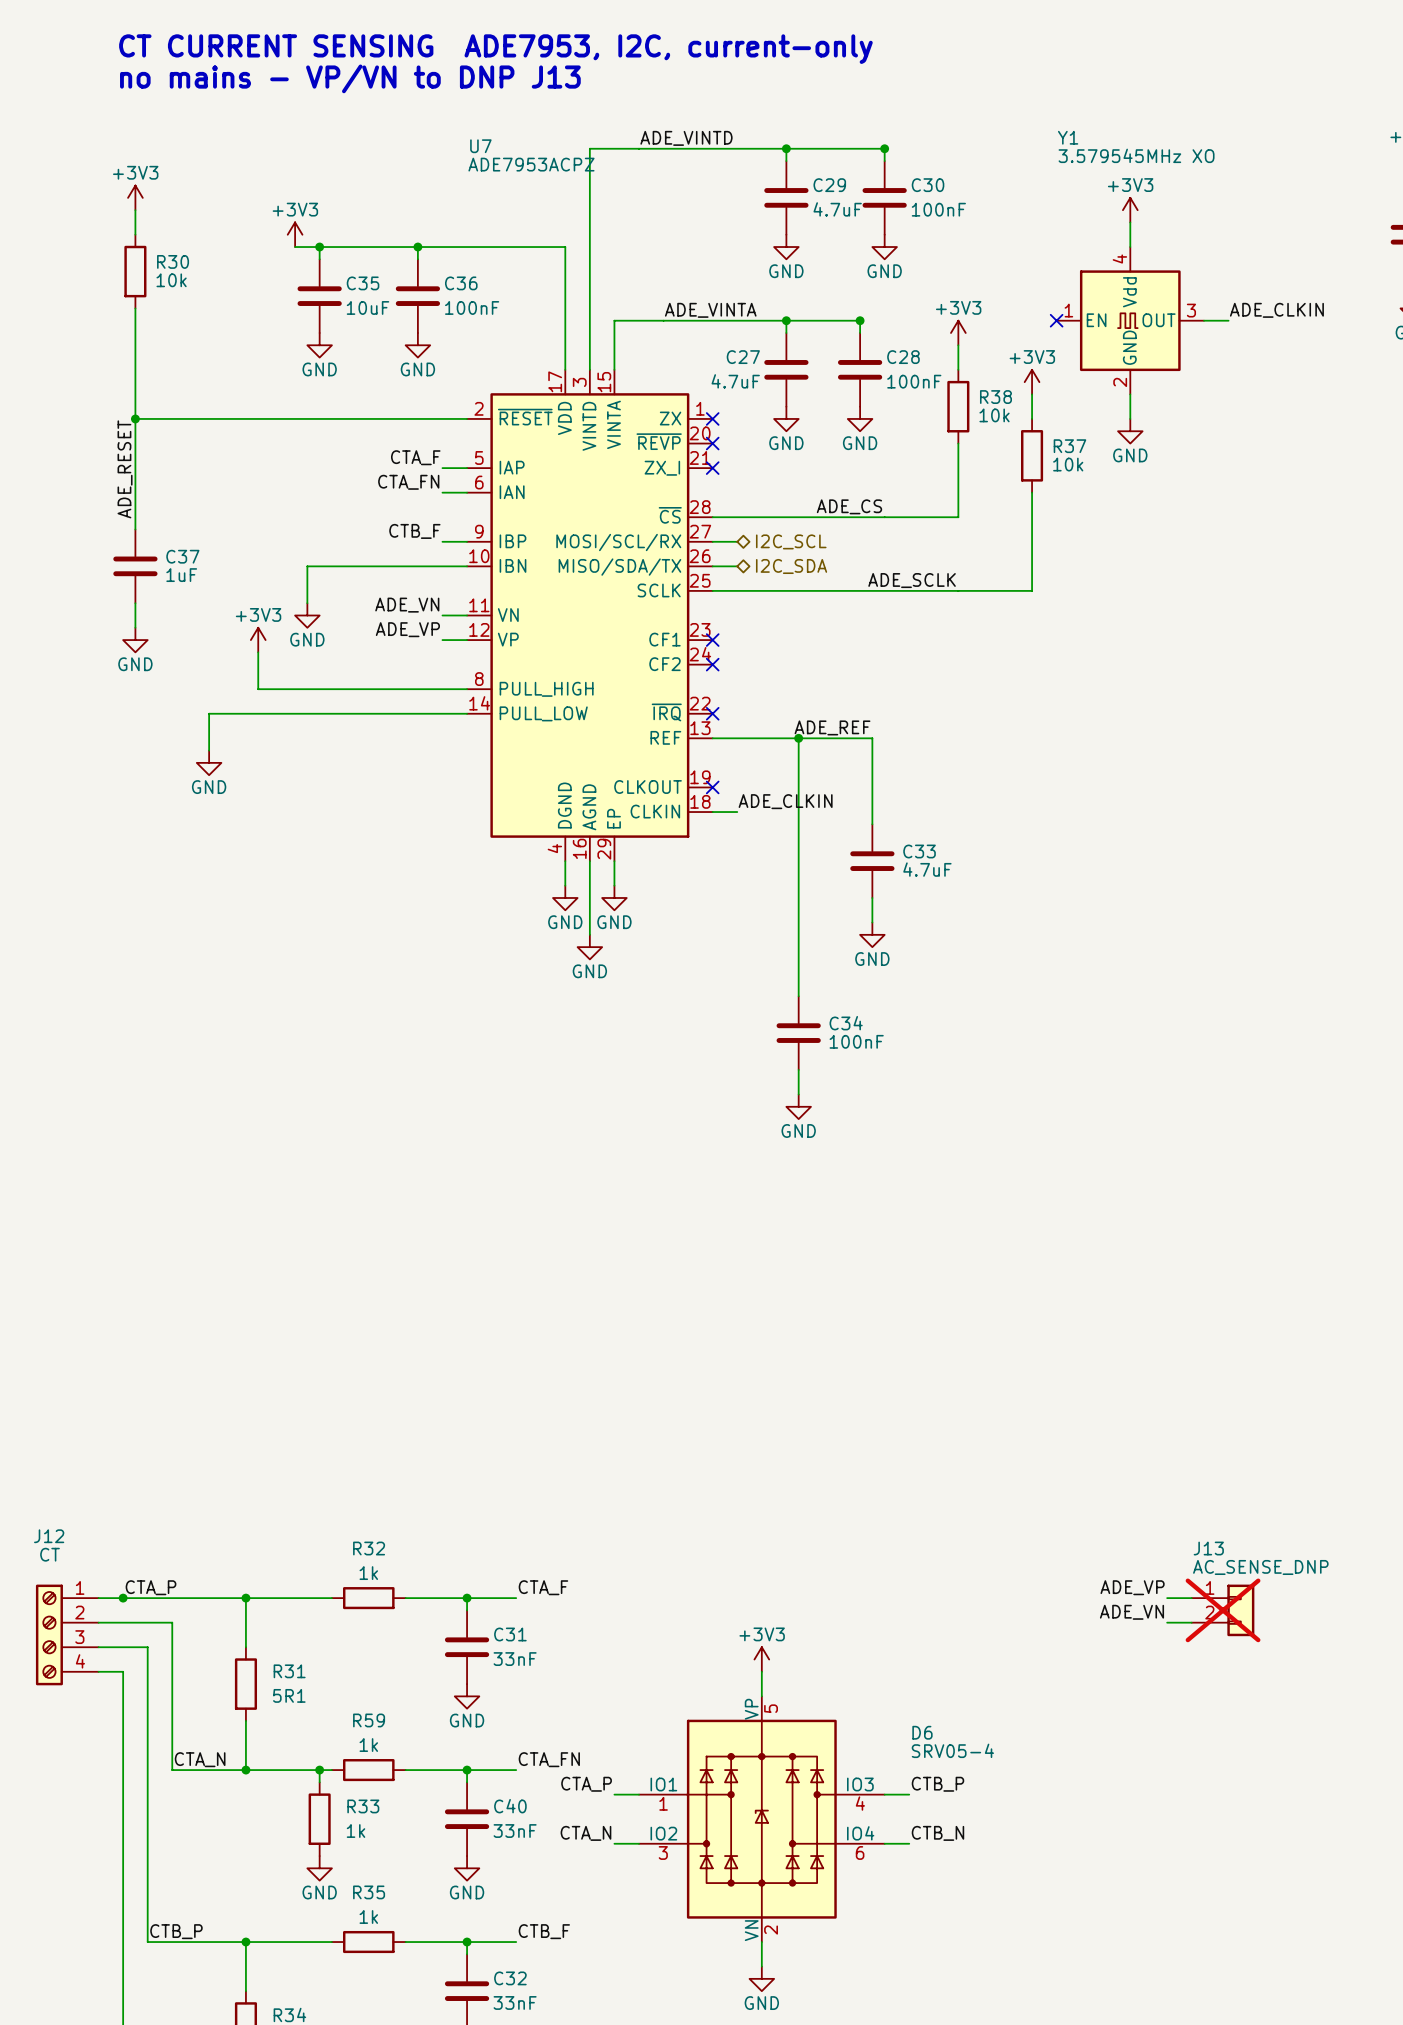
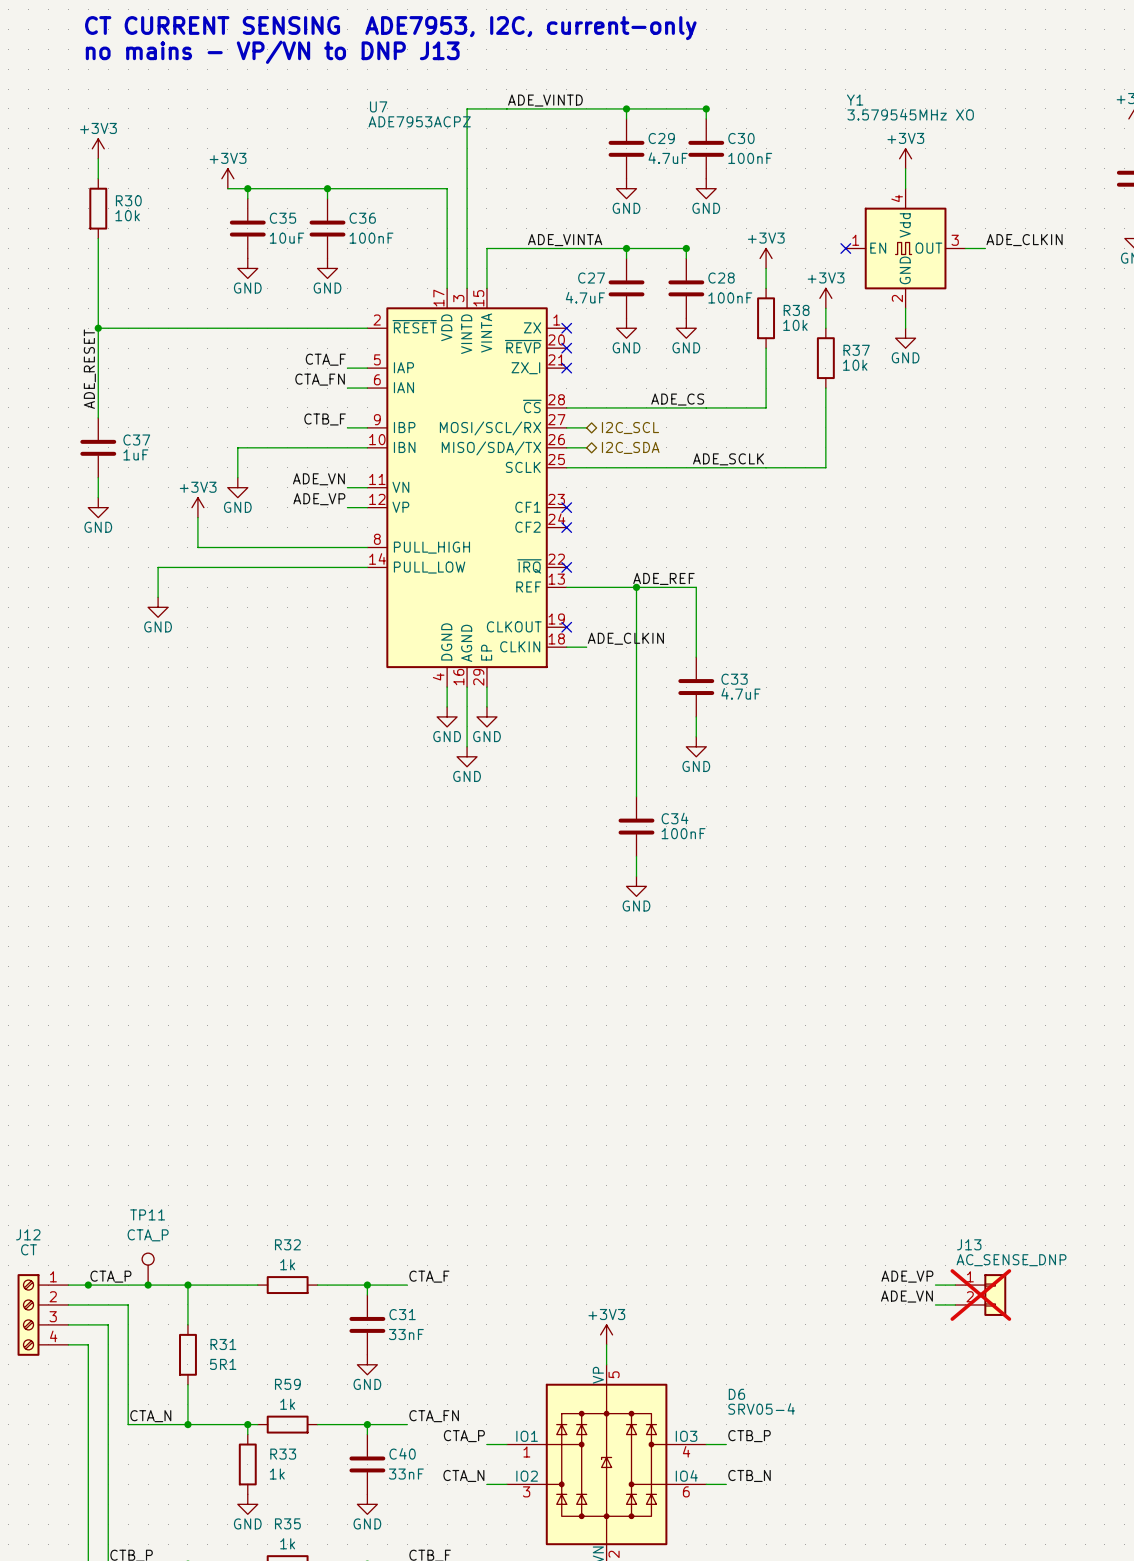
TP11: none -> CTA_P (148, 1269)
junction: none -> (148, 1285)

